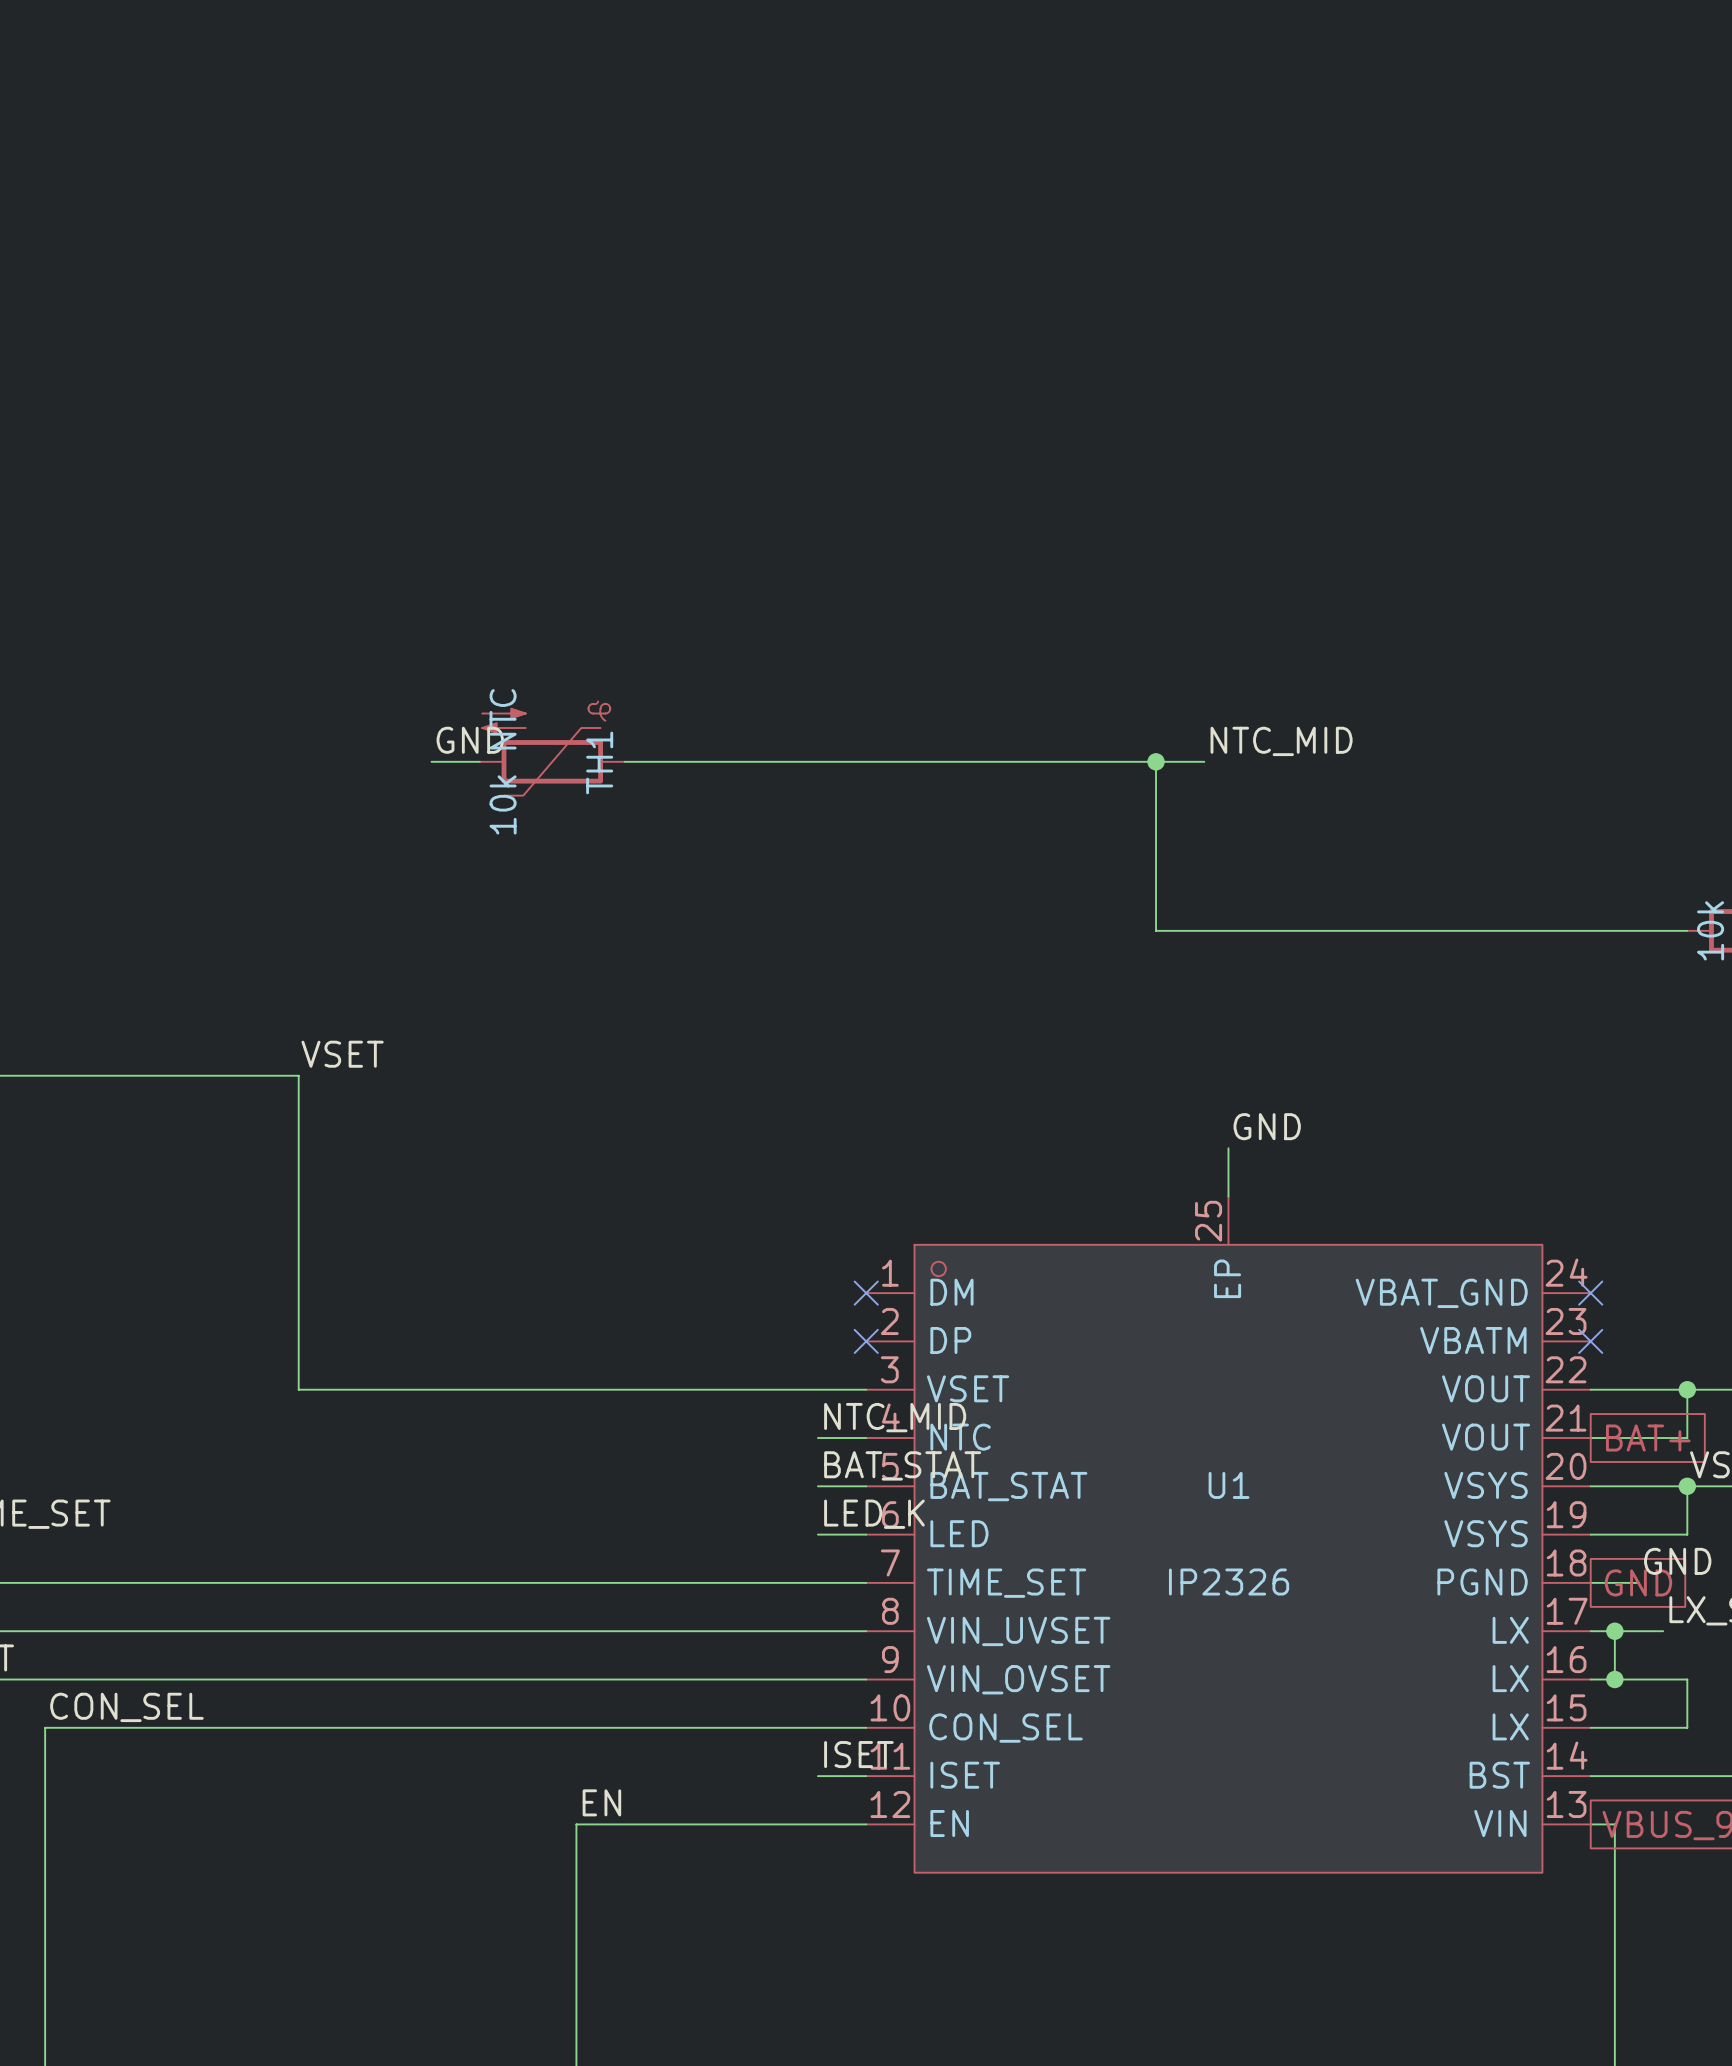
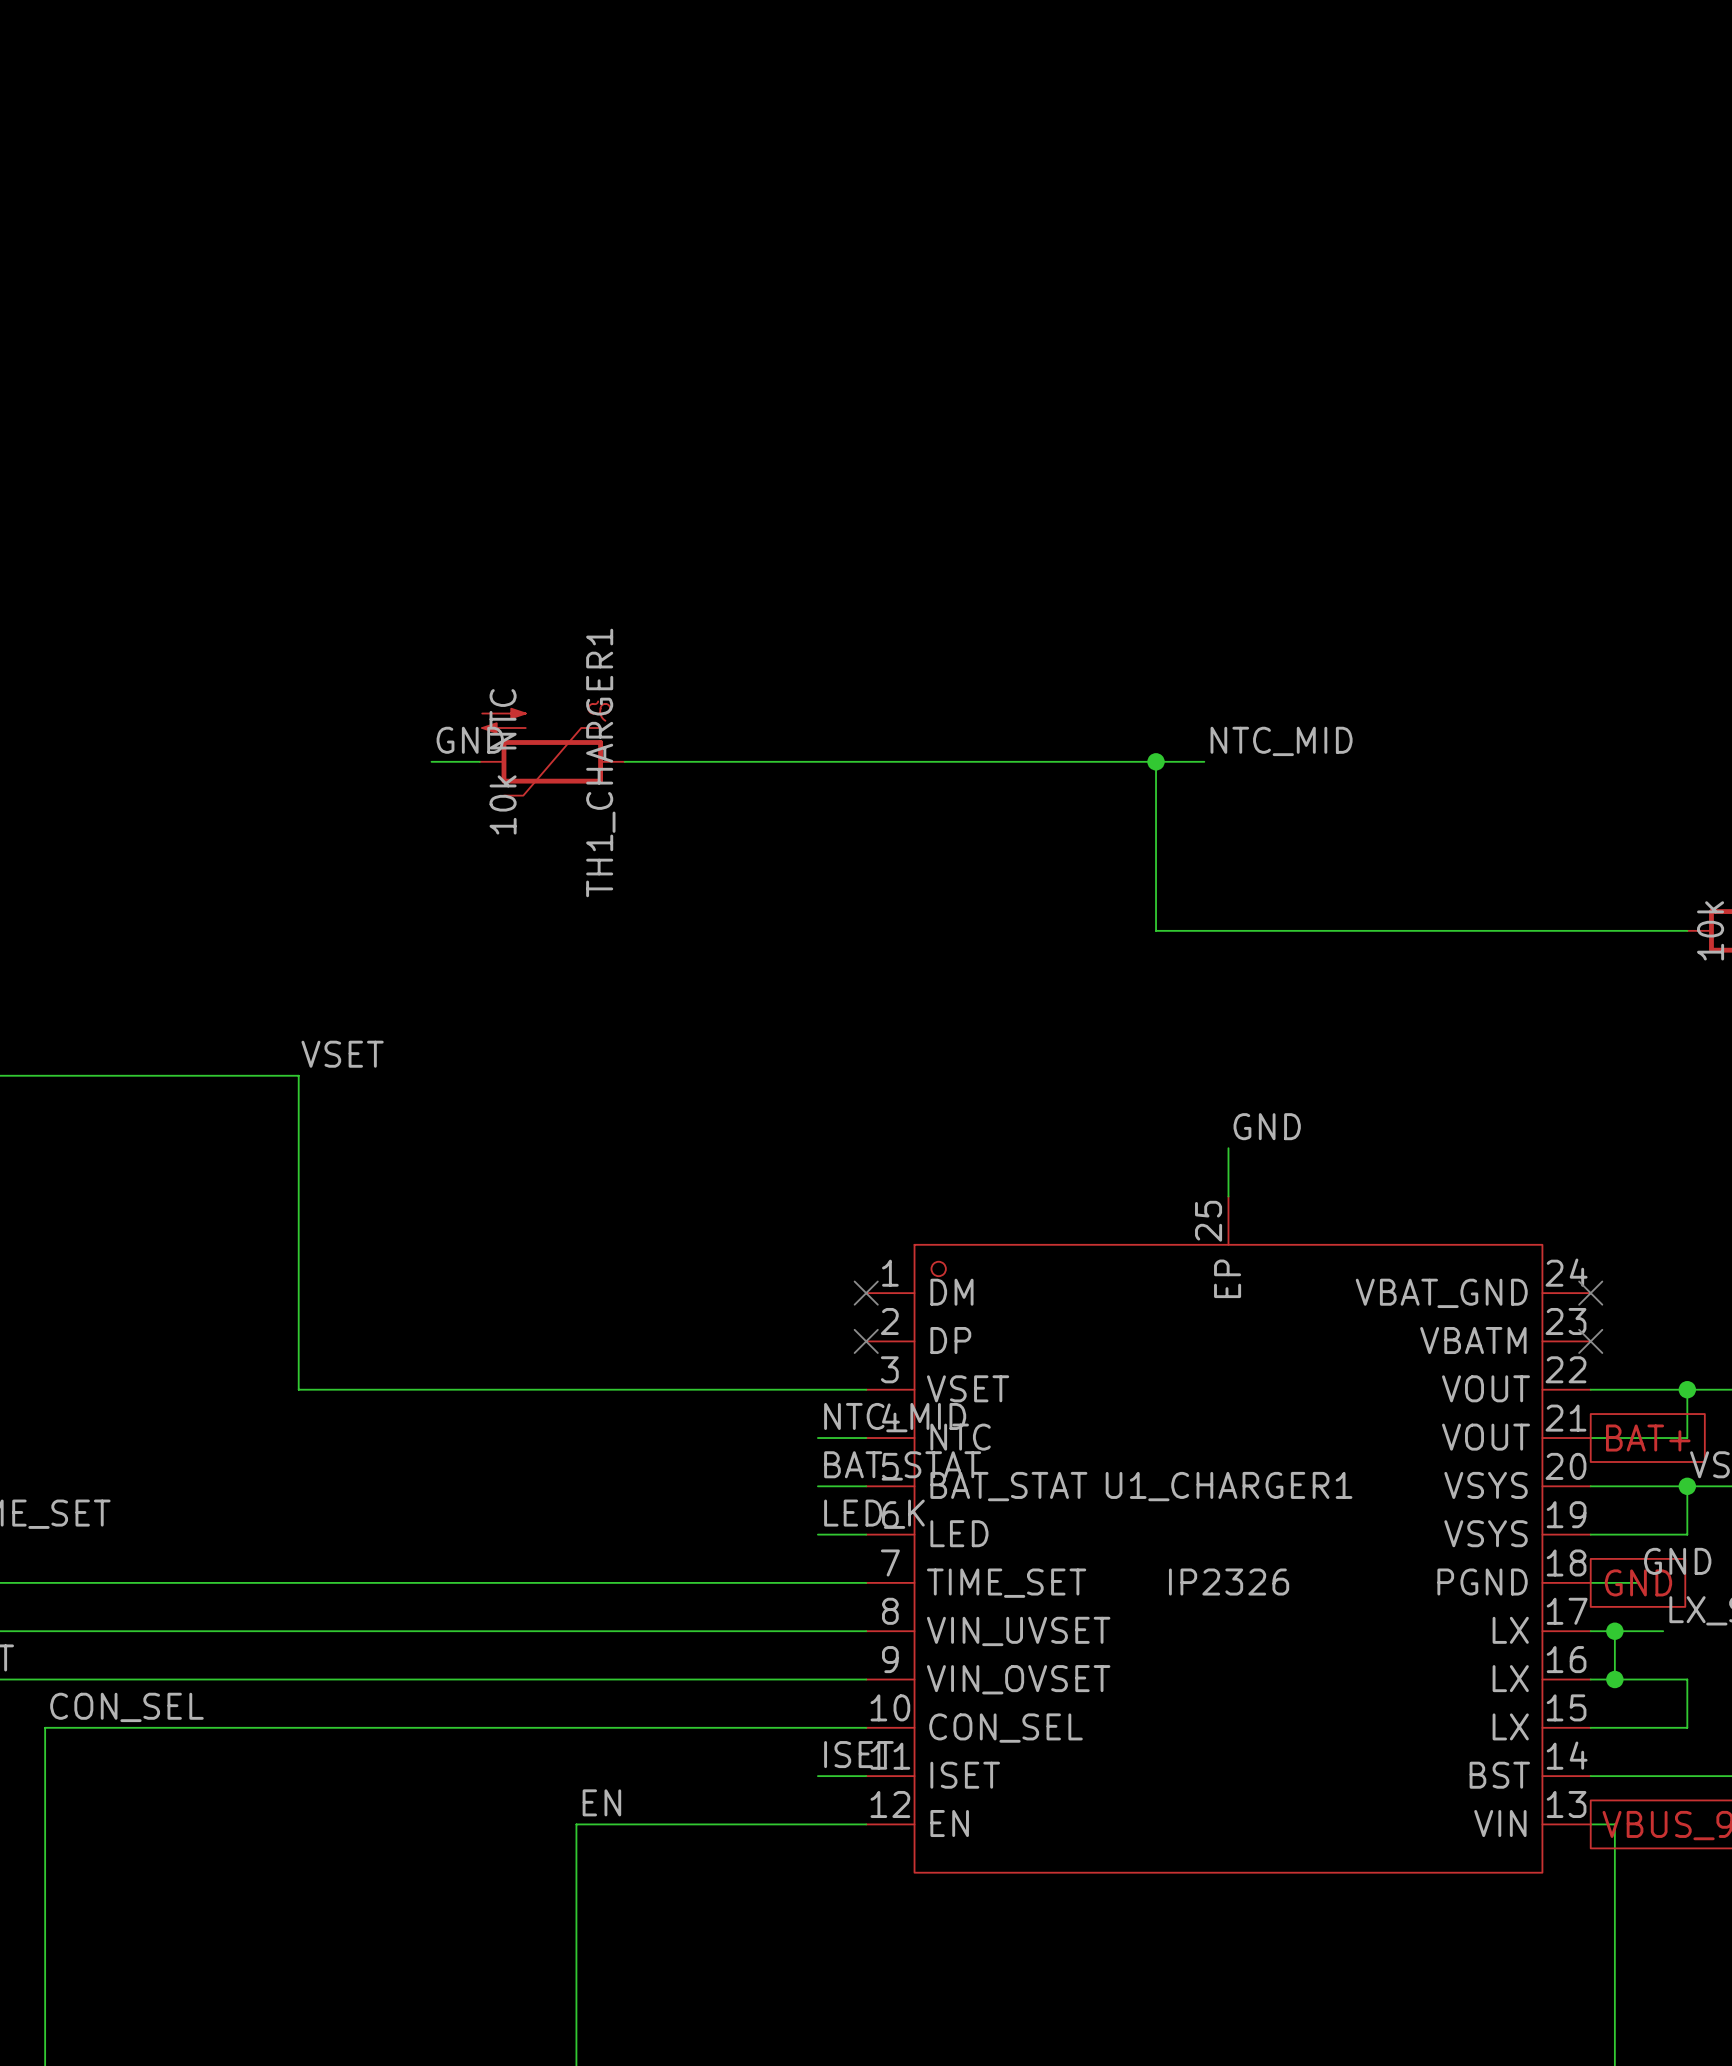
TH1 name: TH1 (599, 762) -> TH1_CHARGER1 (600, 762)
U1 name: U1 (1229, 1485) -> U1_CHARGER1 (1229, 1486)

